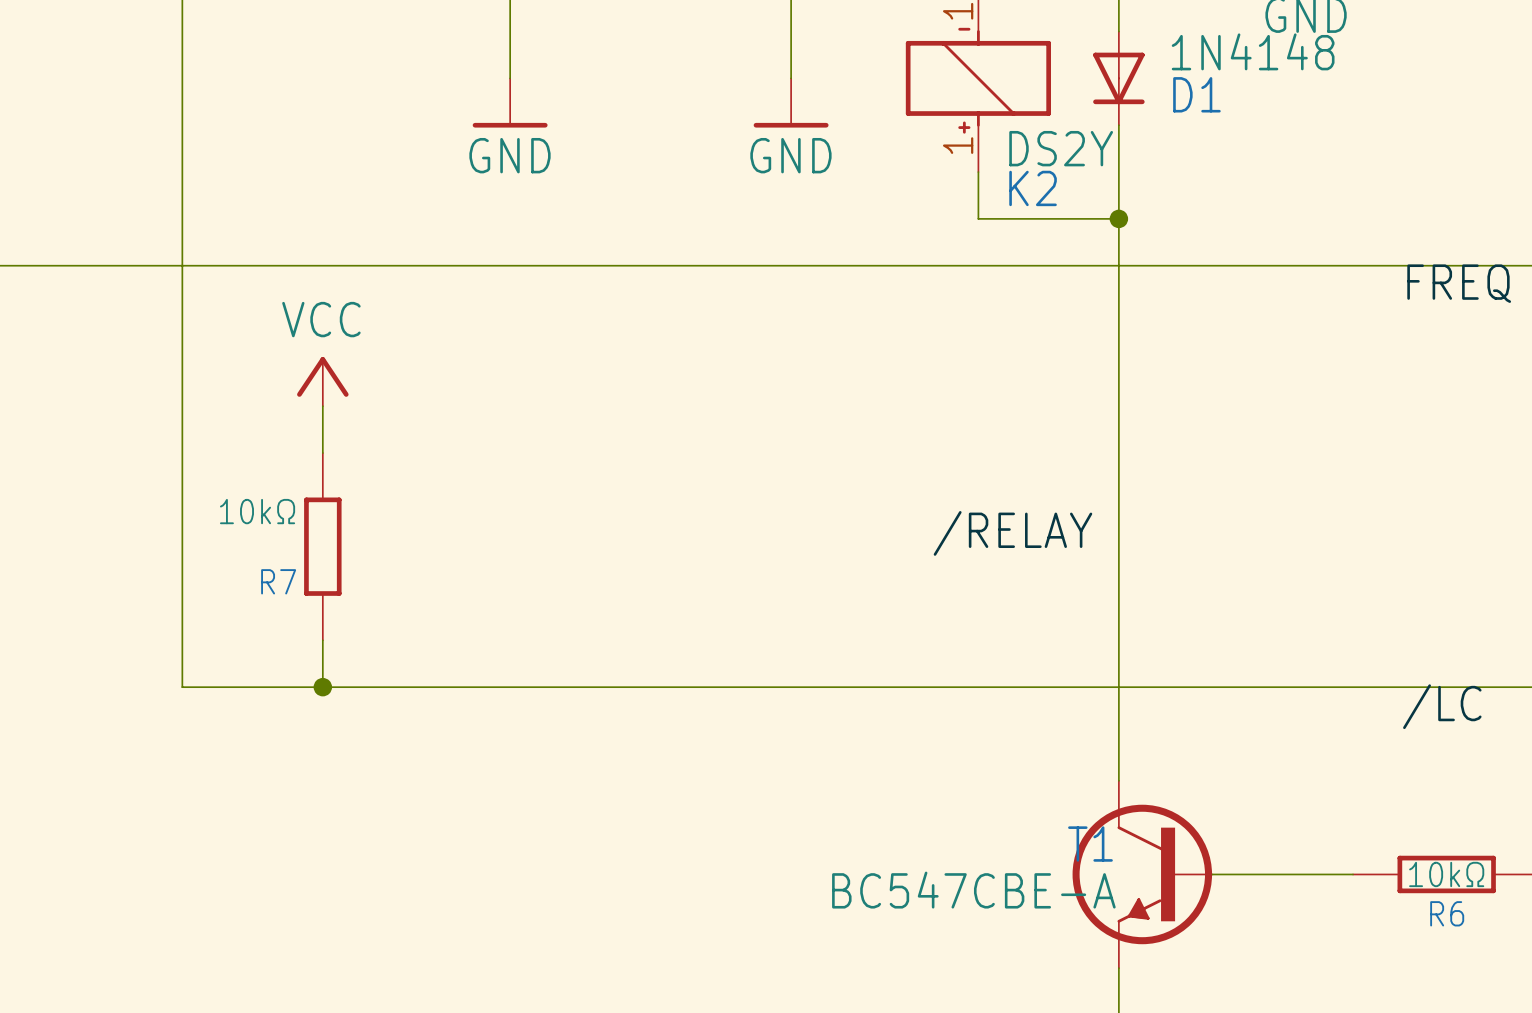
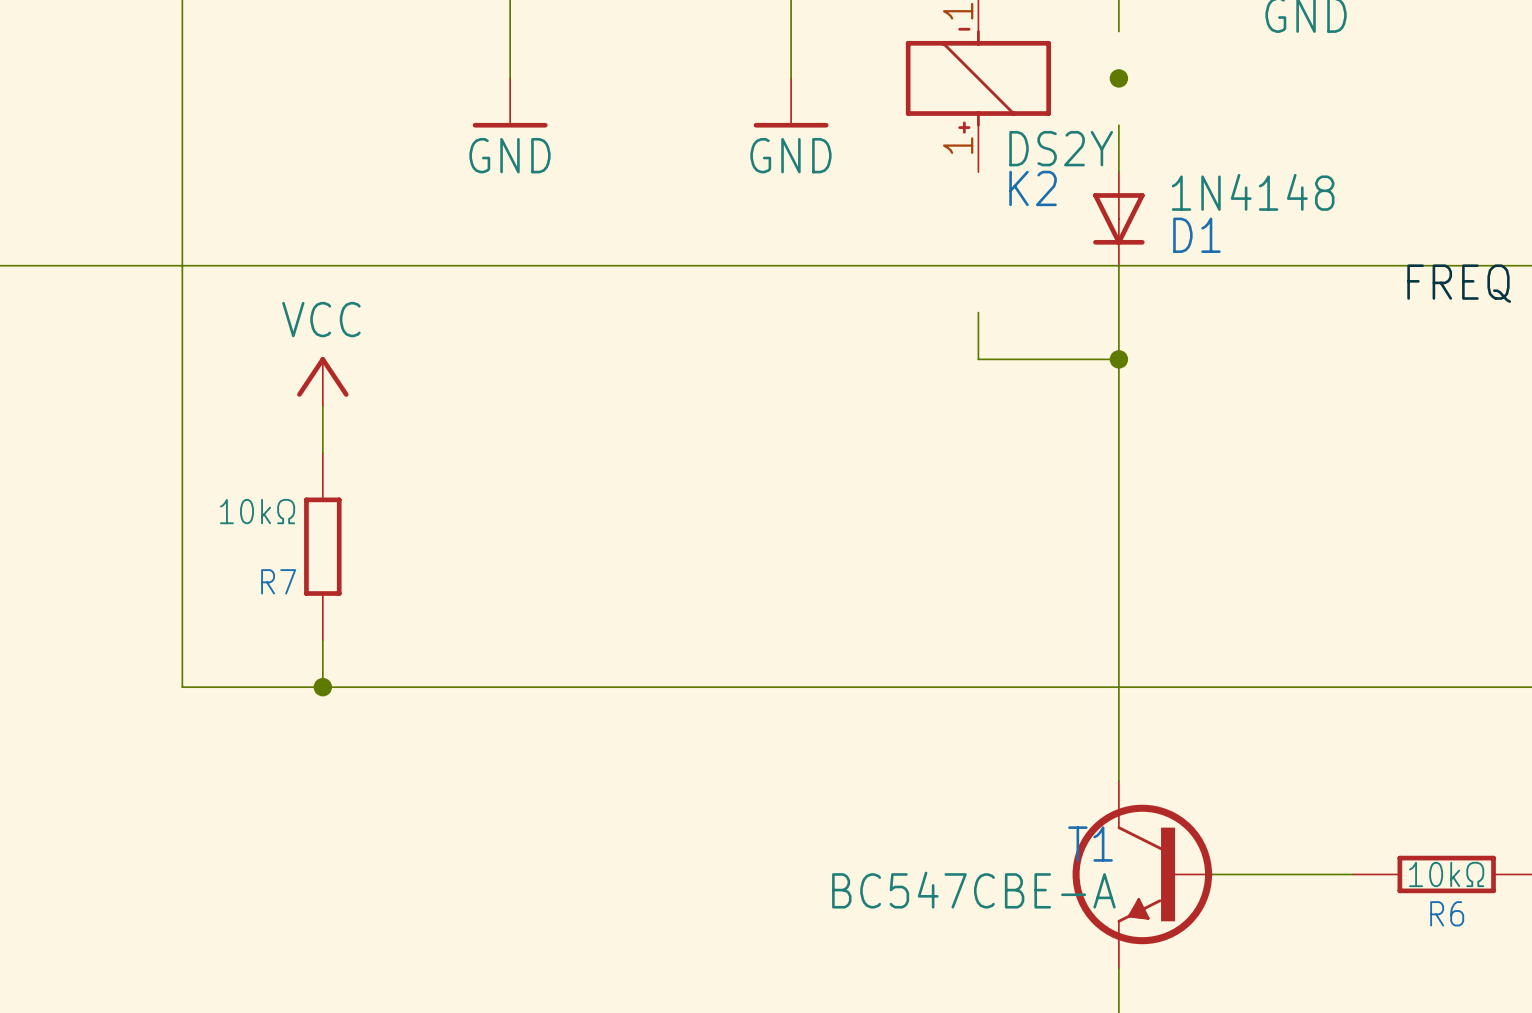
D1 position: (1118, 78) -> (1118, 218)
junction: none -> (1118, 78)
wire: (978, 172) (978, 218) (1118, 218) -> (978, 312) (978, 359) (1118, 359)
junction: (1118, 218) -> none
junction: none -> (1118, 359)
label: /RELAY (1012, 533) -> none
label: /LC (1442, 706) -> none

